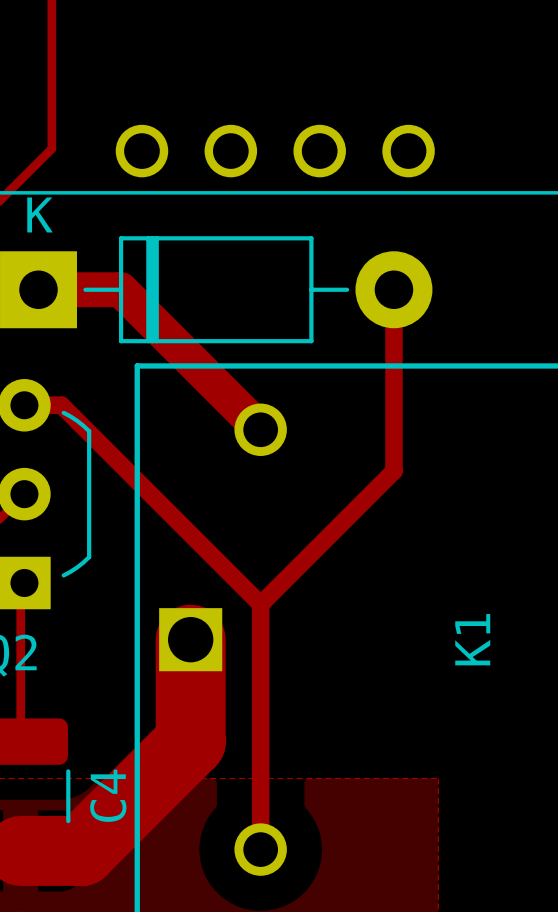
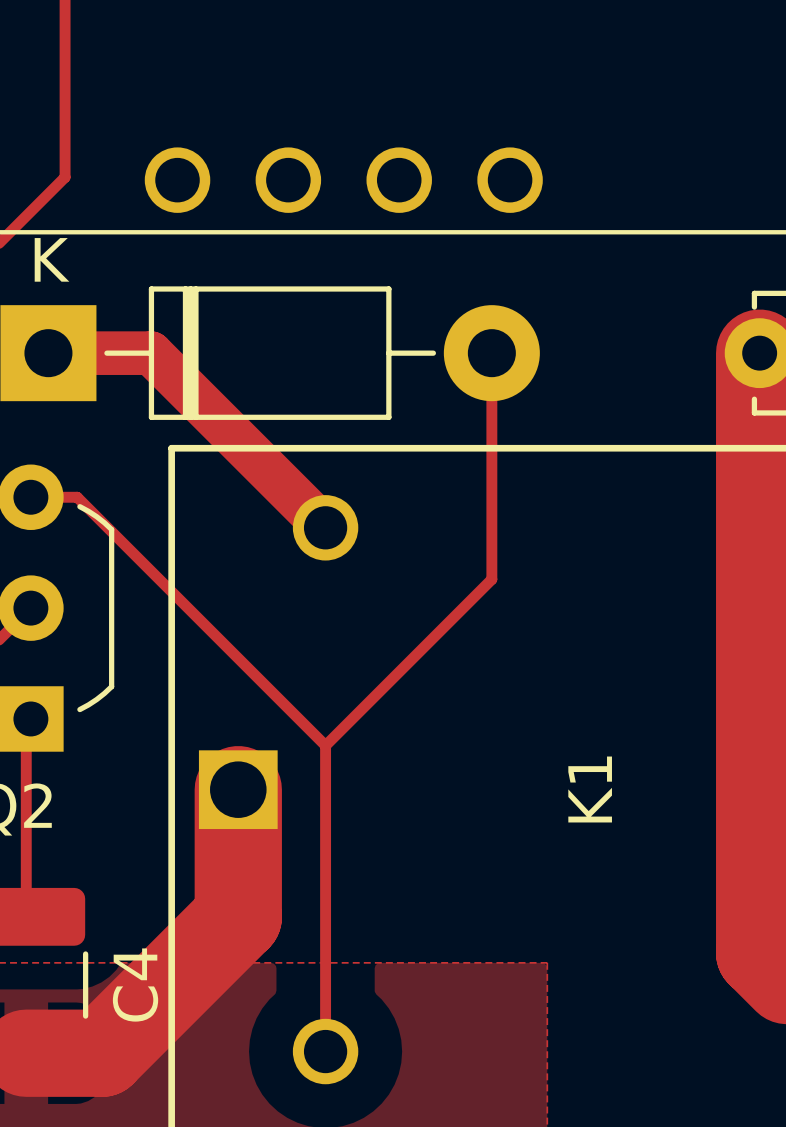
track width: thick (393, 289) (393, 471) (260, 604) -> thin (491, 353) (491, 579) (325, 745)
track width: thick (24, 405) (61, 405) (260, 604) -> thin (30, 497) (77, 497) (325, 745)
track width: thick (260, 604) (260, 849) -> thin (325, 745) (325, 1051)

